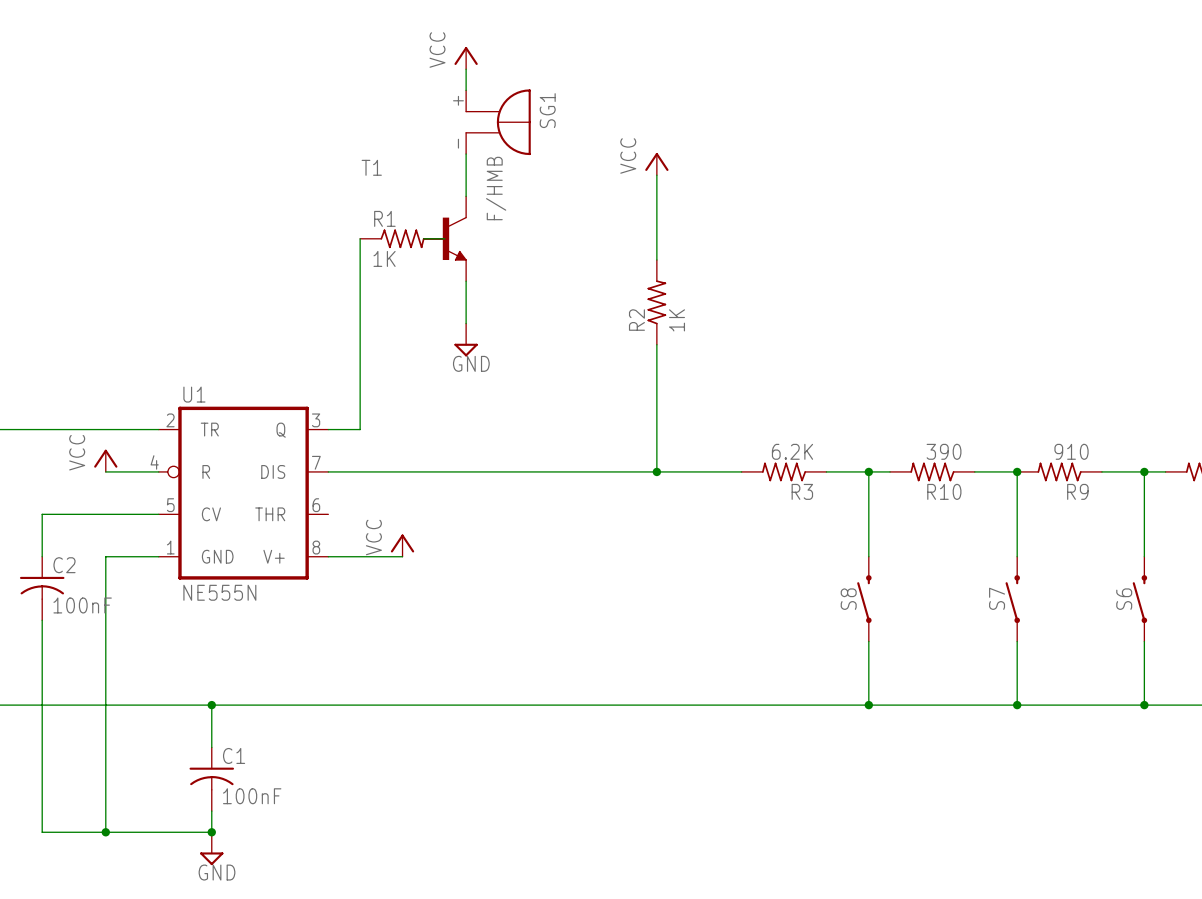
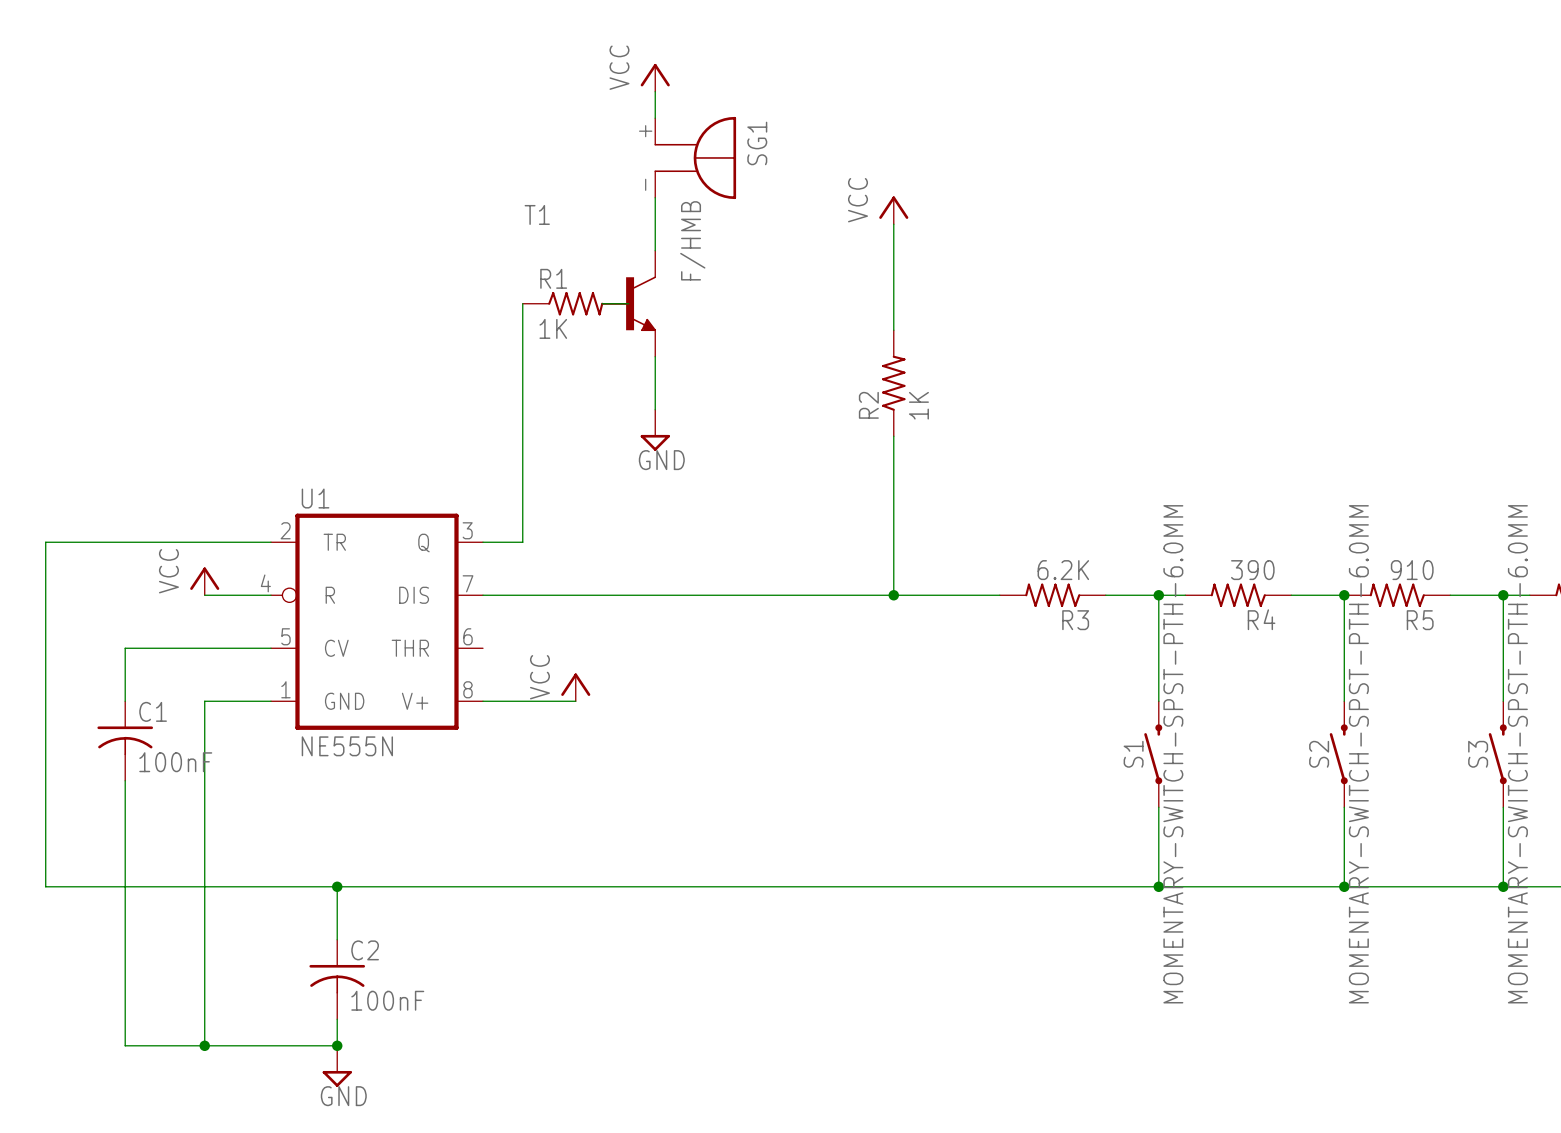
R10 name: R10 (944, 491) -> R4 (1261, 619)
R9 name: R9 (1077, 491) -> R5 (1420, 620)
C2 name: C2 (64, 565) -> C1 (153, 711)
S7 name: S7 (997, 598) -> S2 (1319, 754)
S8 name: S8 (848, 599) -> S1 (1133, 754)
S8 value: none -> MOMENTARY-SWITCH-SPST-PTH-6.0MM (1173, 754)
S7 value: none -> MOMENTARY-SWITCH-SPST-PTH-6.0MM (1358, 754)
S6 name: S6 (1124, 599) -> S3 (1478, 754)
S6 value: none -> MOMENTARY-SWITCH-SPST-PTH-6.0MM (1517, 754)
C1 name: C1 (234, 755) -> C2 (365, 950)

